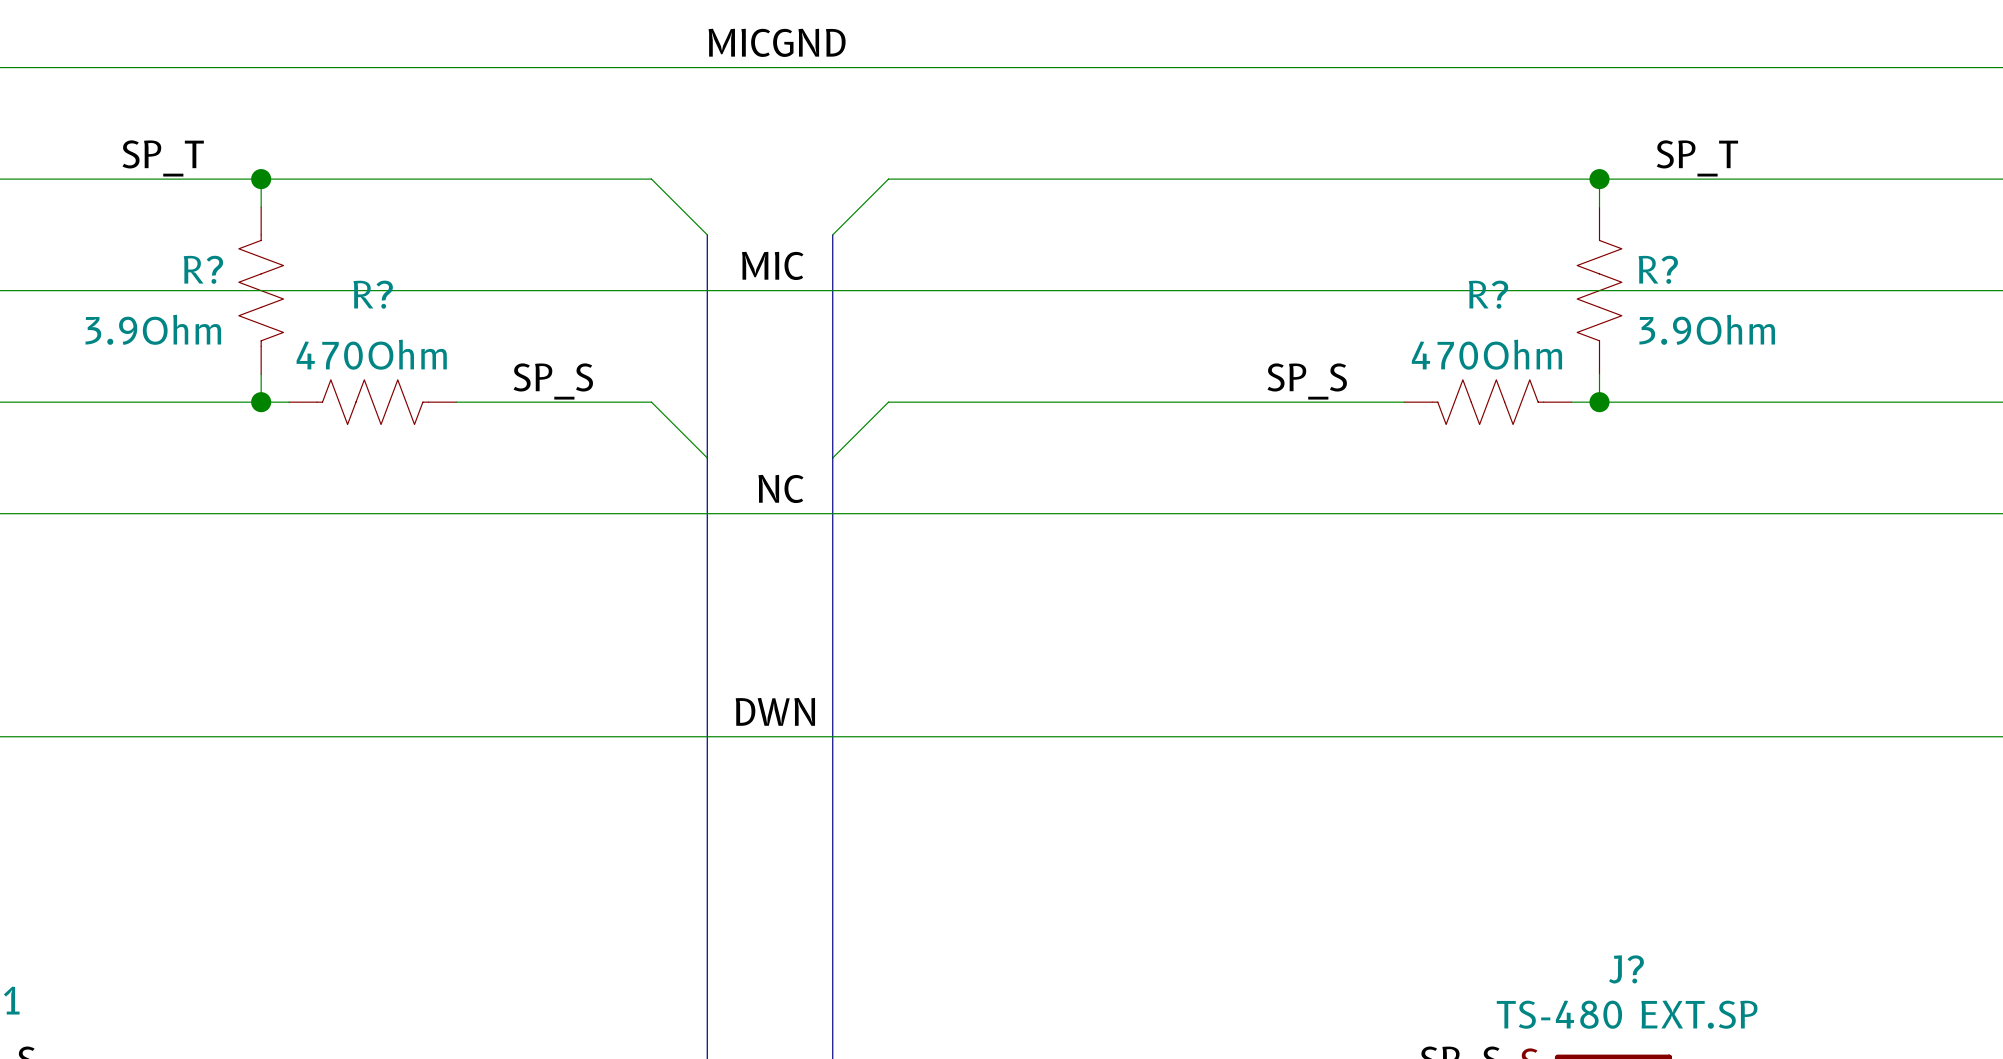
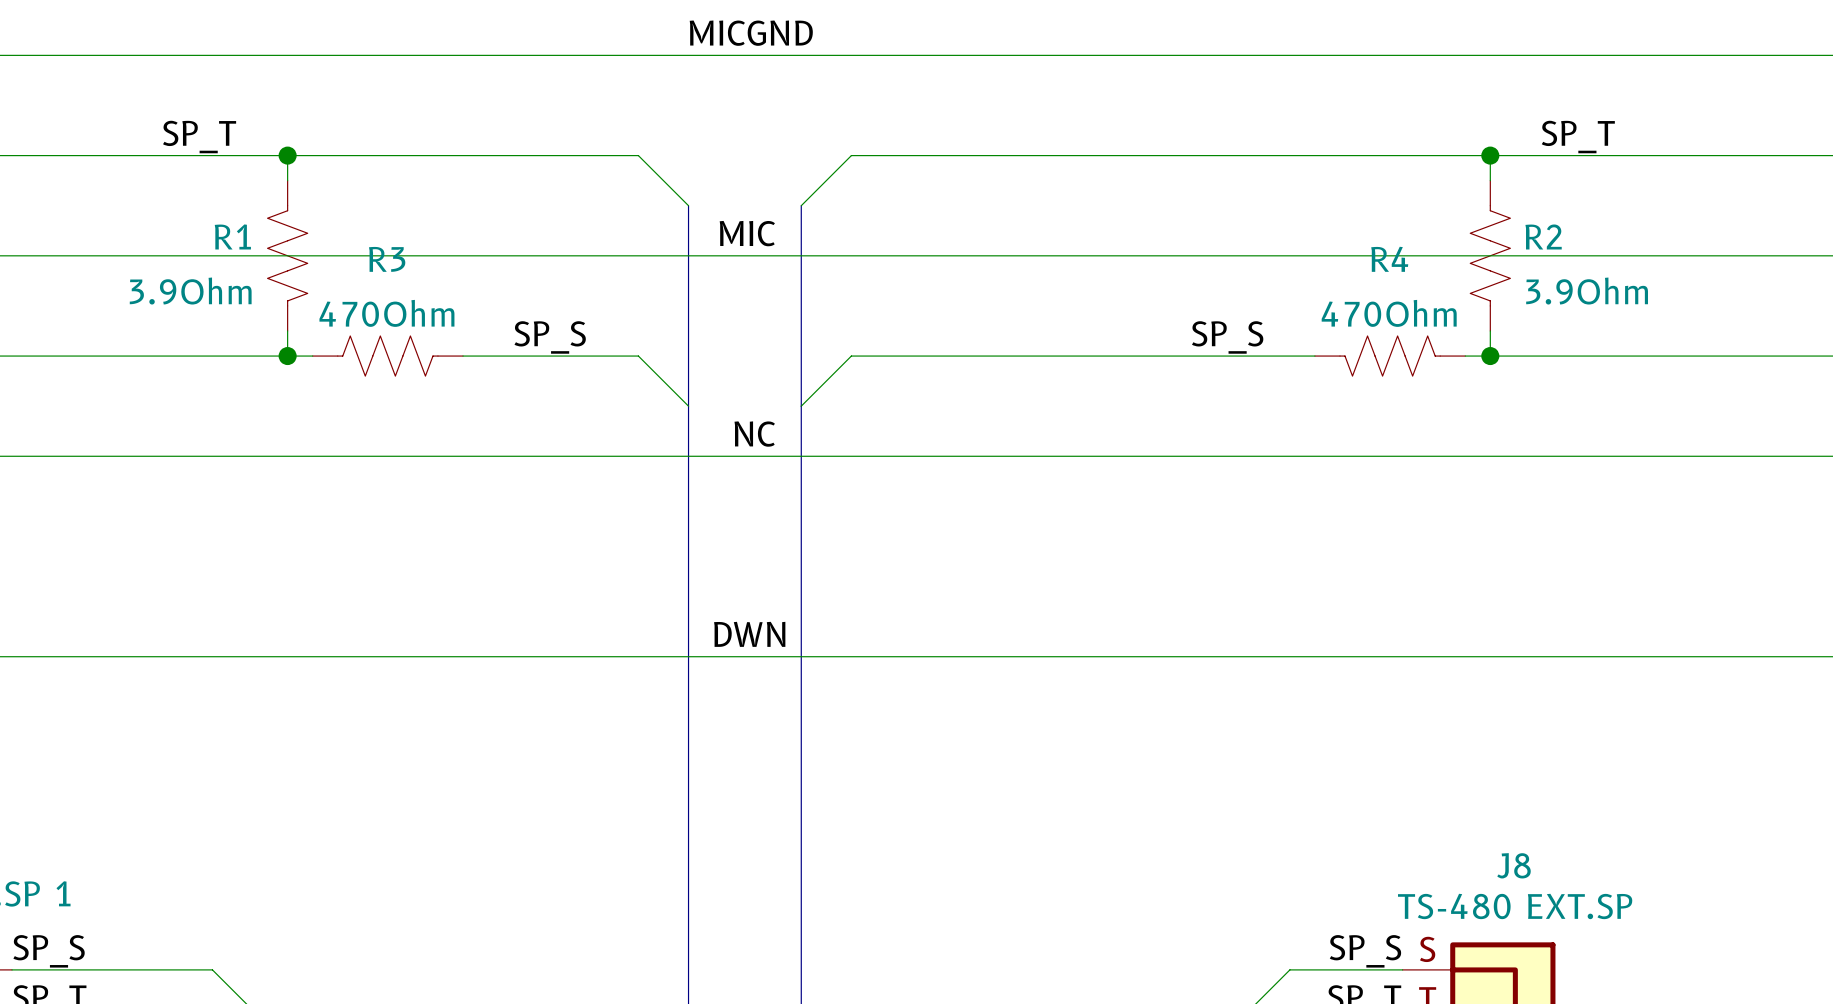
R? name: R? (203, 269) -> R1 (232, 236)
R? name: R? (1658, 269) -> R2 (1543, 236)
R? name: R? (373, 294) -> R3 (387, 259)
R? name: R? (1488, 294) -> R4 (1389, 259)
J? name: J? (1626, 969) -> J8 (1513, 865)

